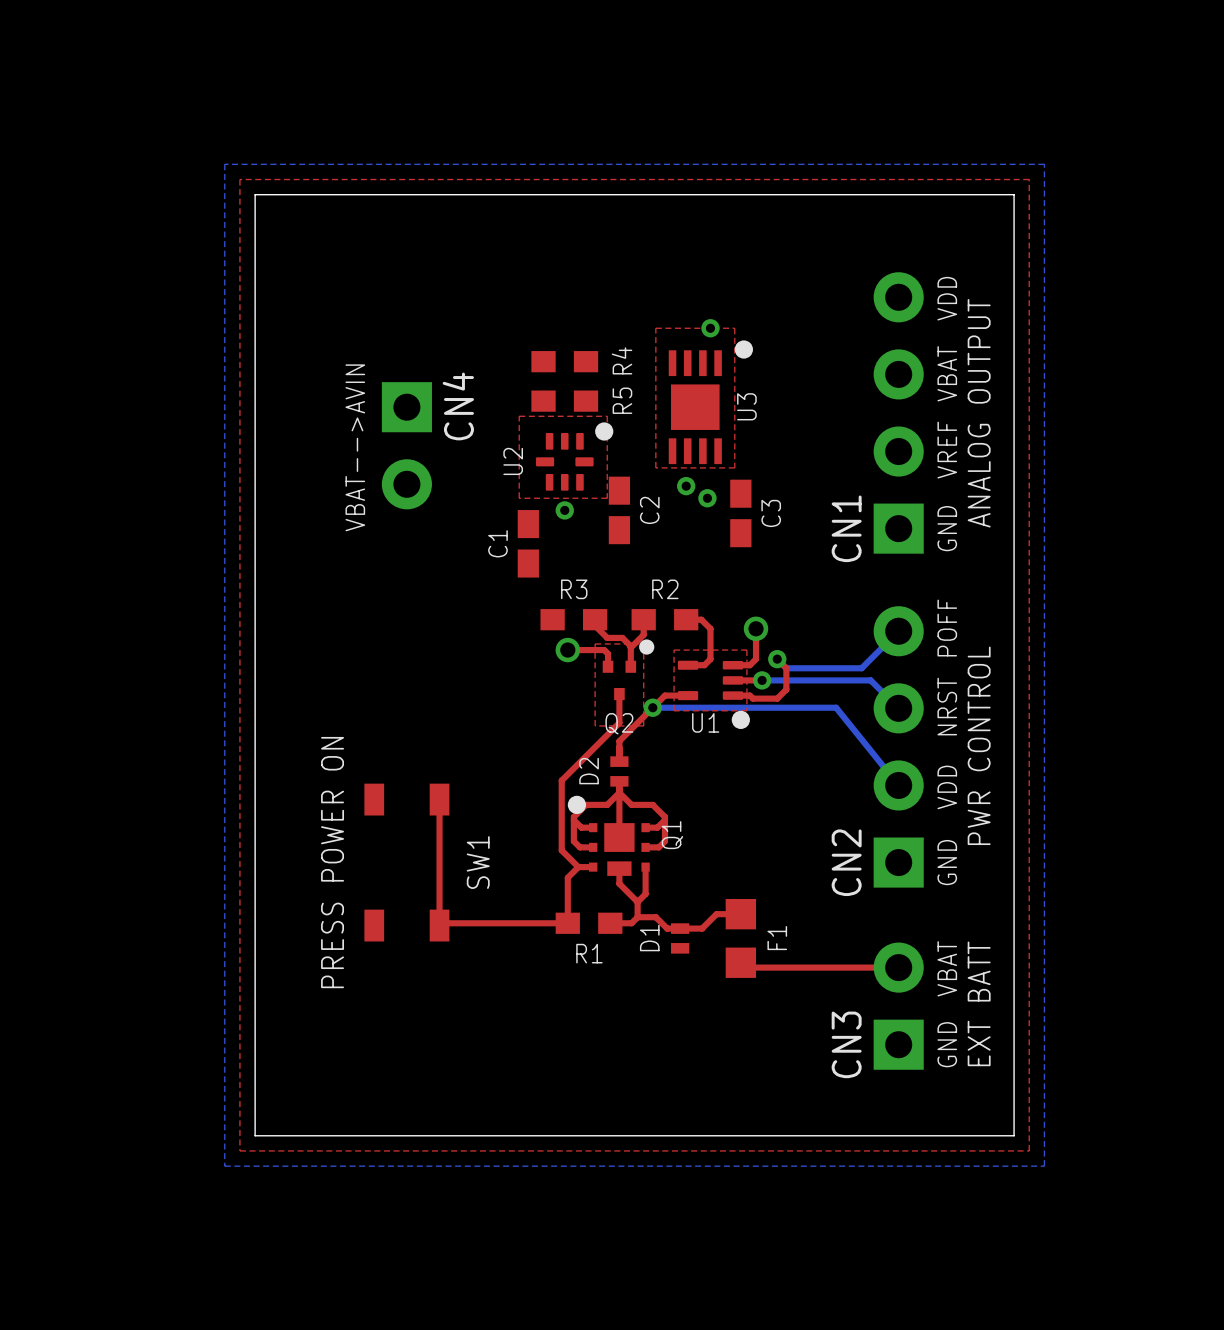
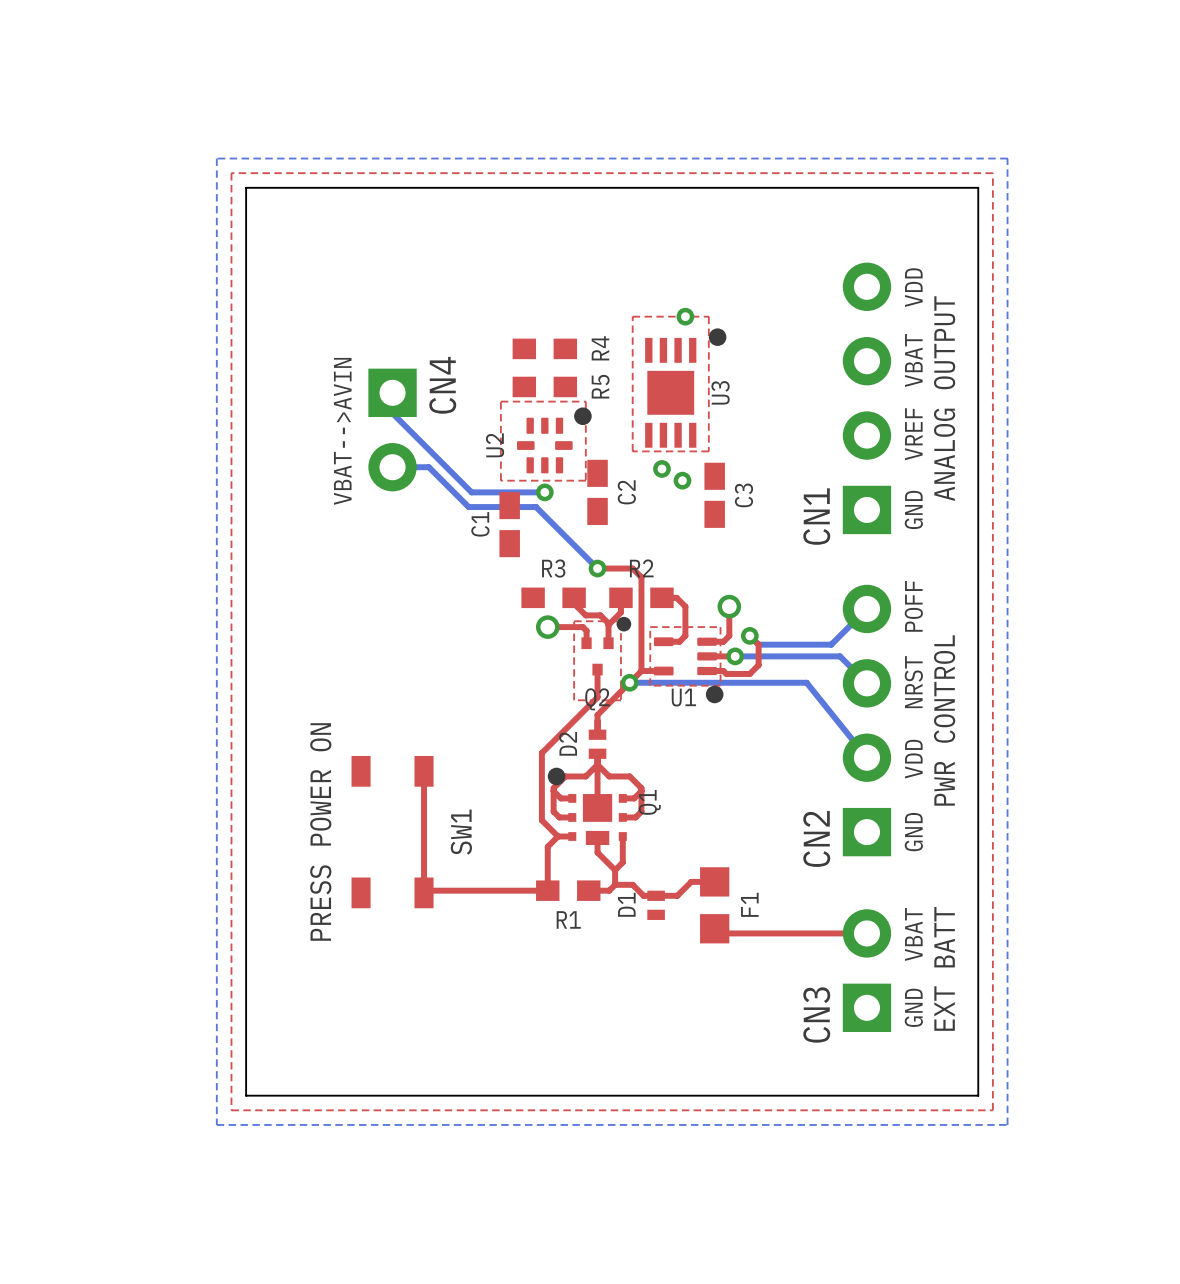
bottom track: none -> (392, 392) (392, 413) (471, 492) (547, 492)
bottom track: none -> (392, 467) (428, 467) (468, 507) (536, 507) (597, 568)
top track: none -> (597, 568) (632, 568) (641, 577) (641, 671)
via: none -> (597, 568)

